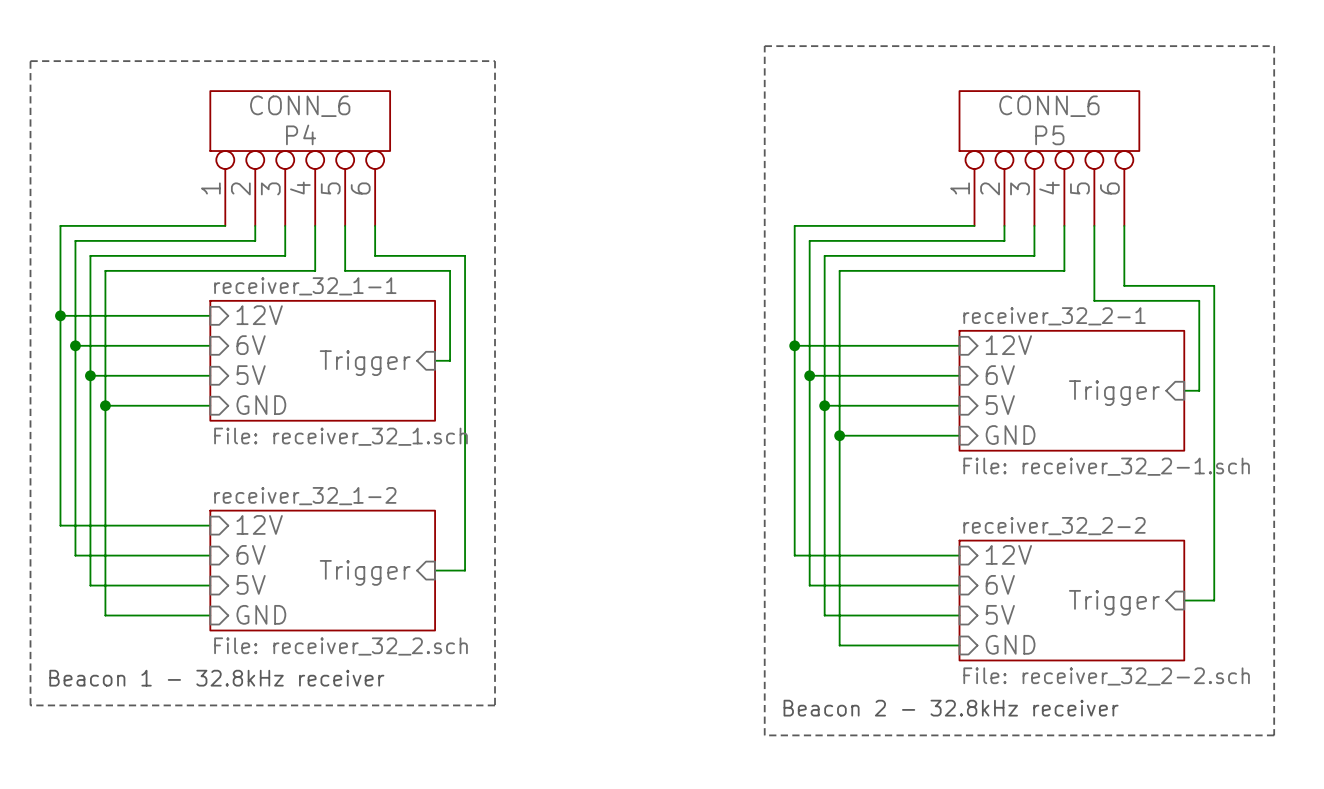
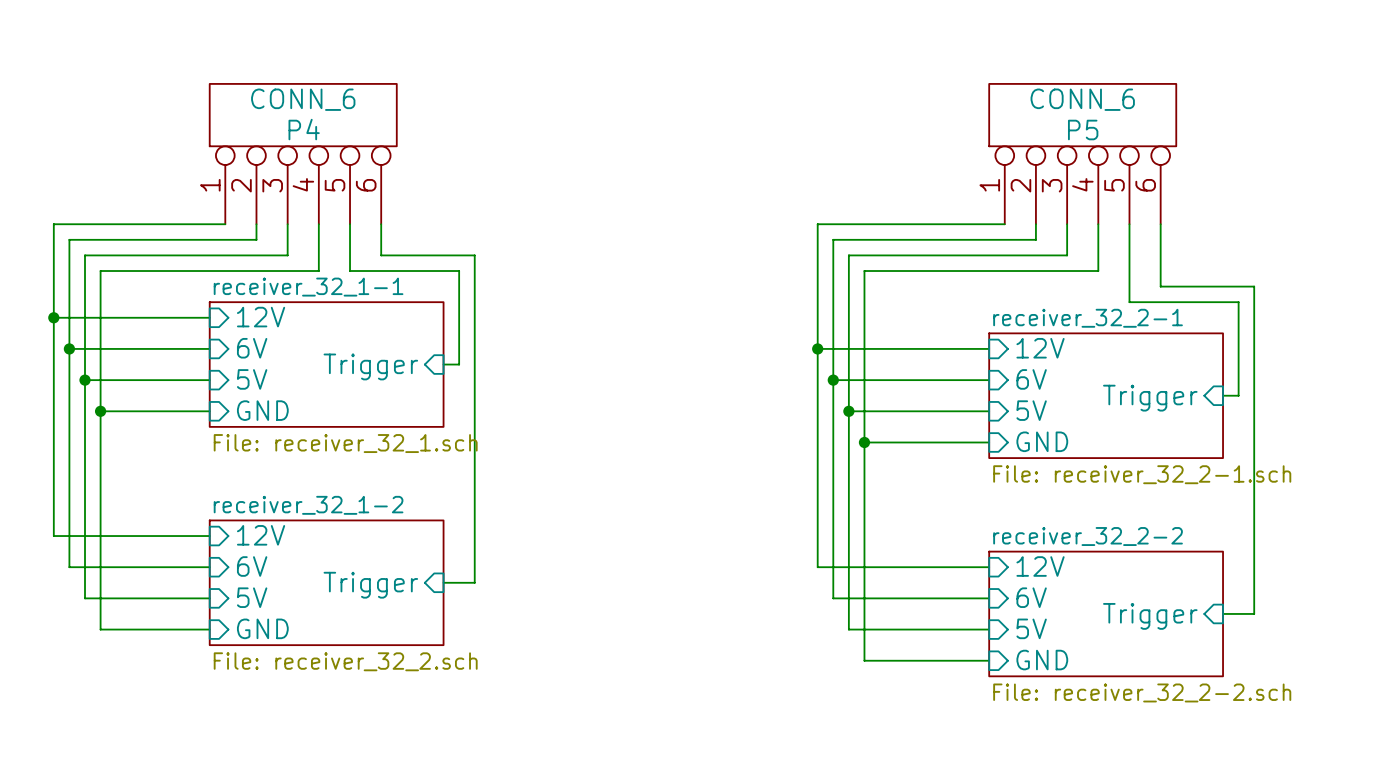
line: (764, 46) (764, 735) (1274, 735) (1274, 46) (764, 46) -> none
line: (30, 61) (30, 705) (495, 705) (495, 61) (30, 61) -> none
text: Beacon 1 - 32.8kHz receiver (216, 678) -> none
text: Beacon 2 - 32.8kHz receiver (951, 708) -> none

